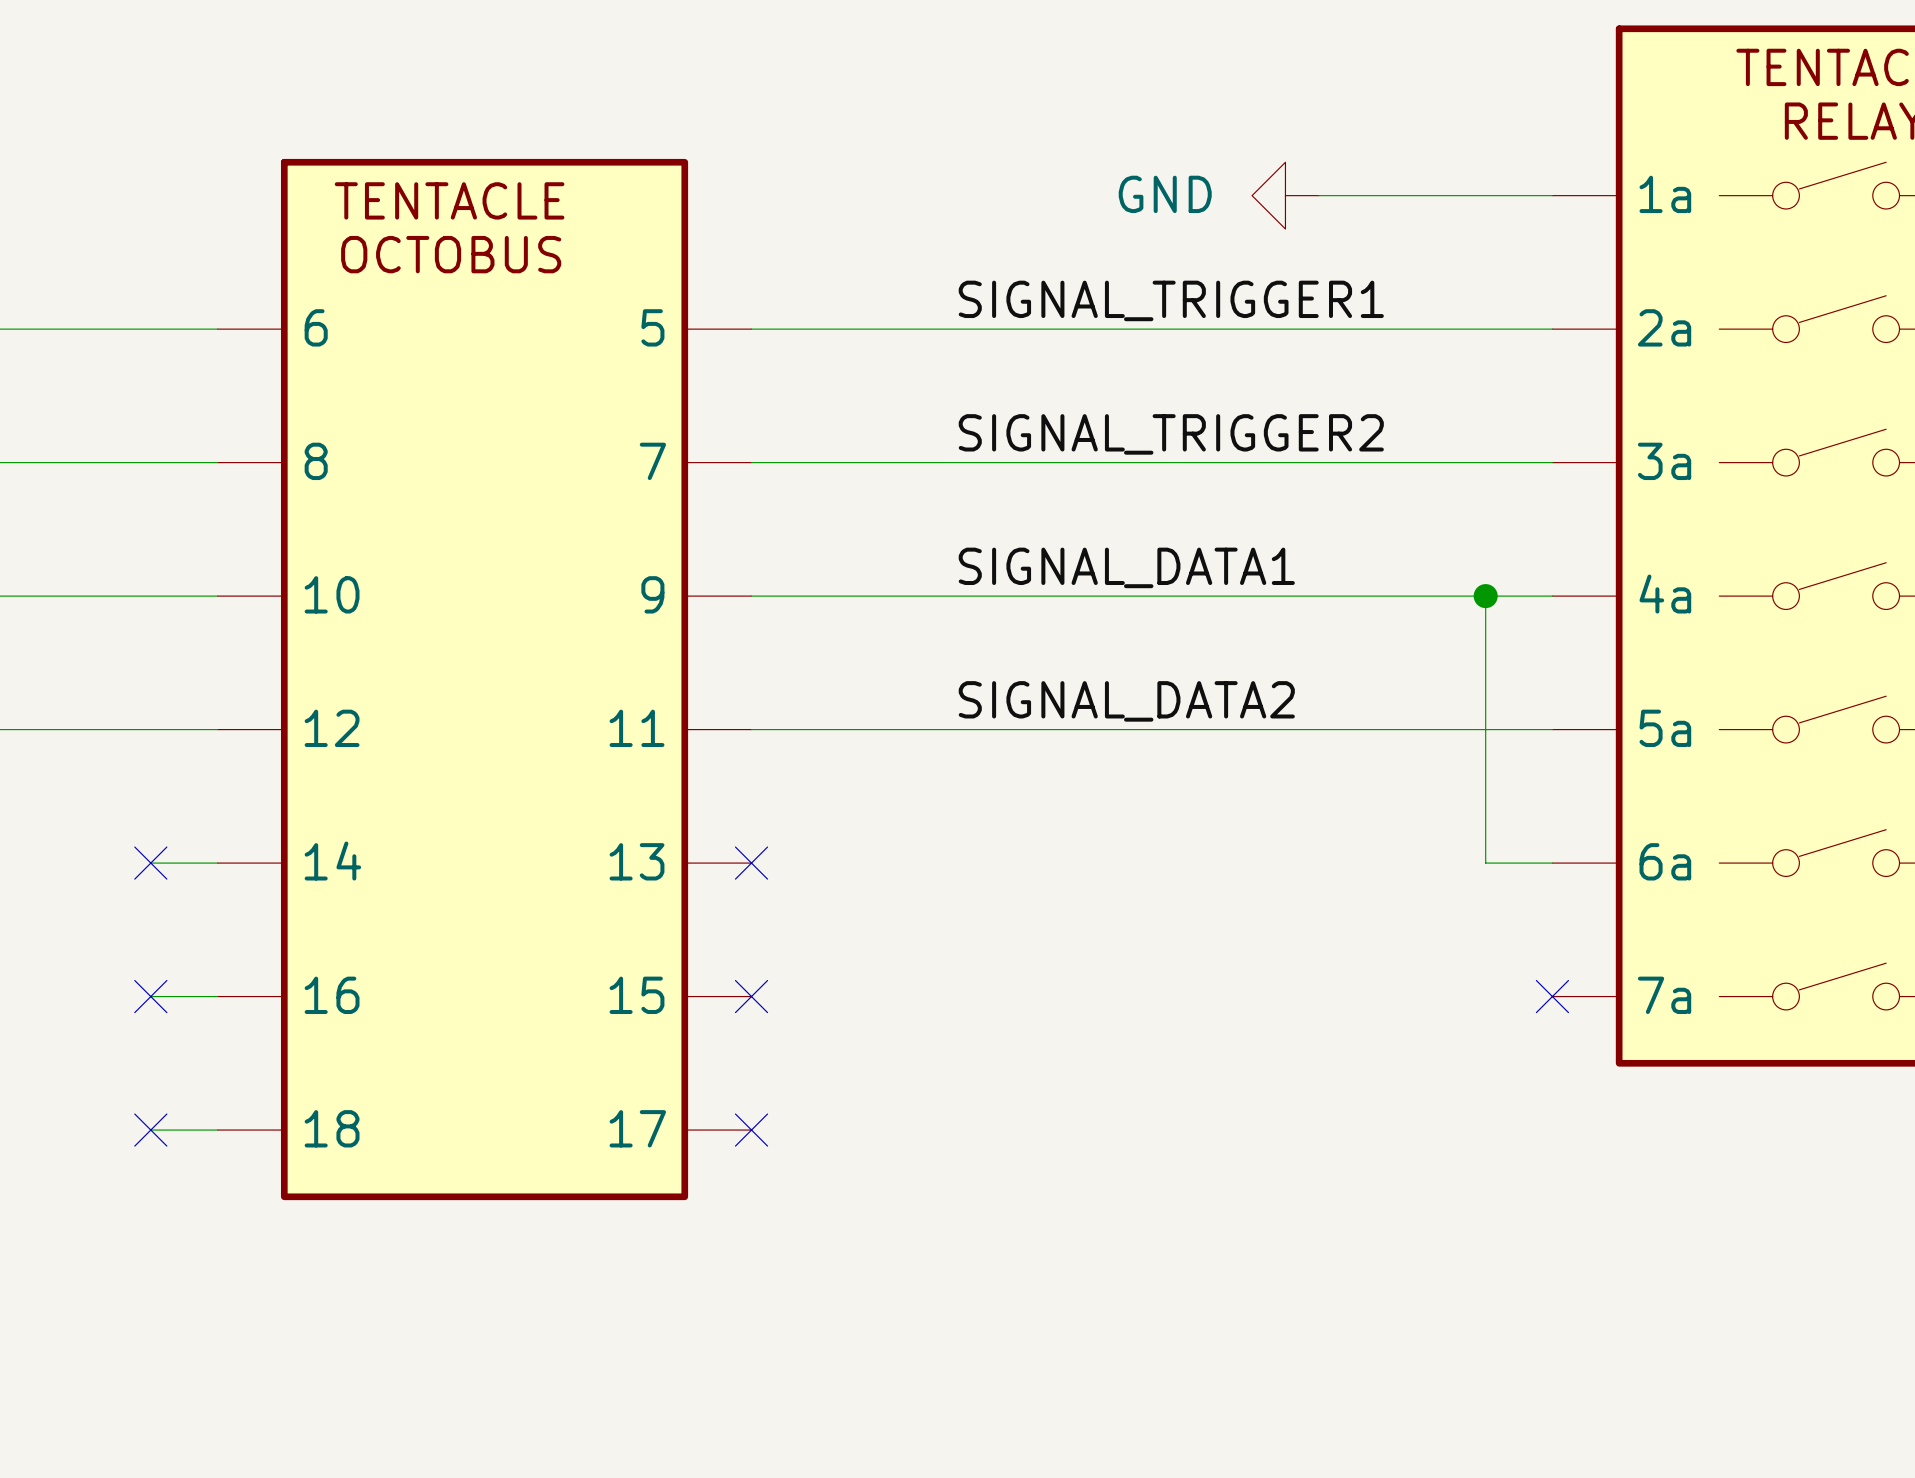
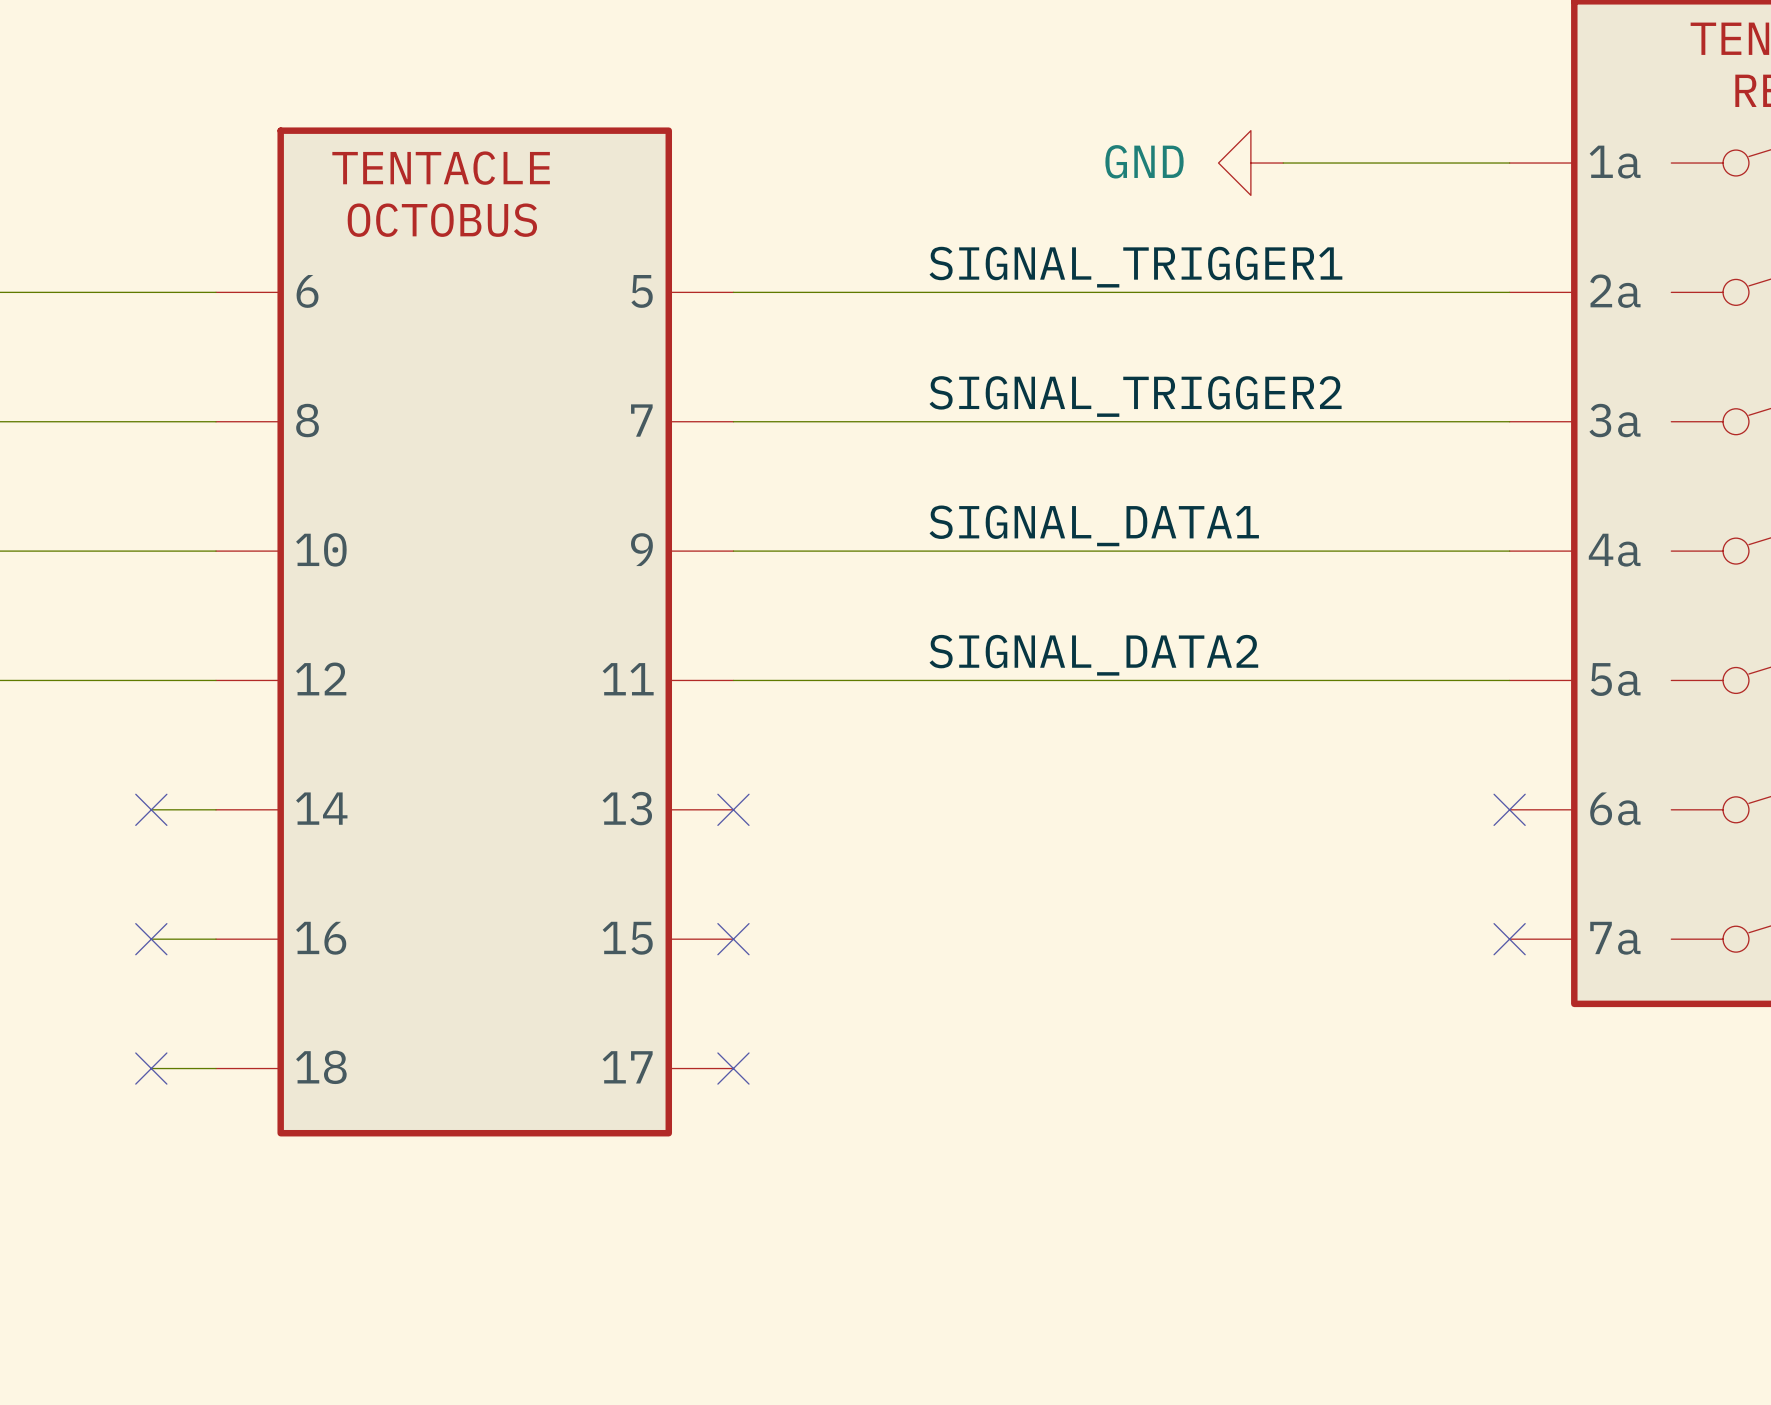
wire: (1485, 596) (1485, 863) (1552, 863) -> none
junction: (1485, 596) -> none
no-connect mark: none -> (1509, 809)

